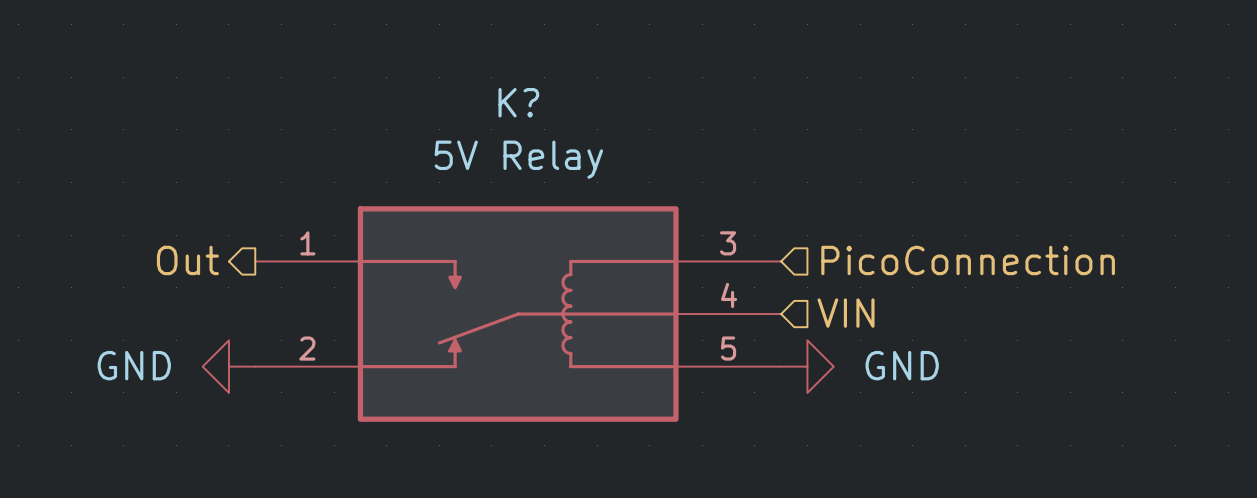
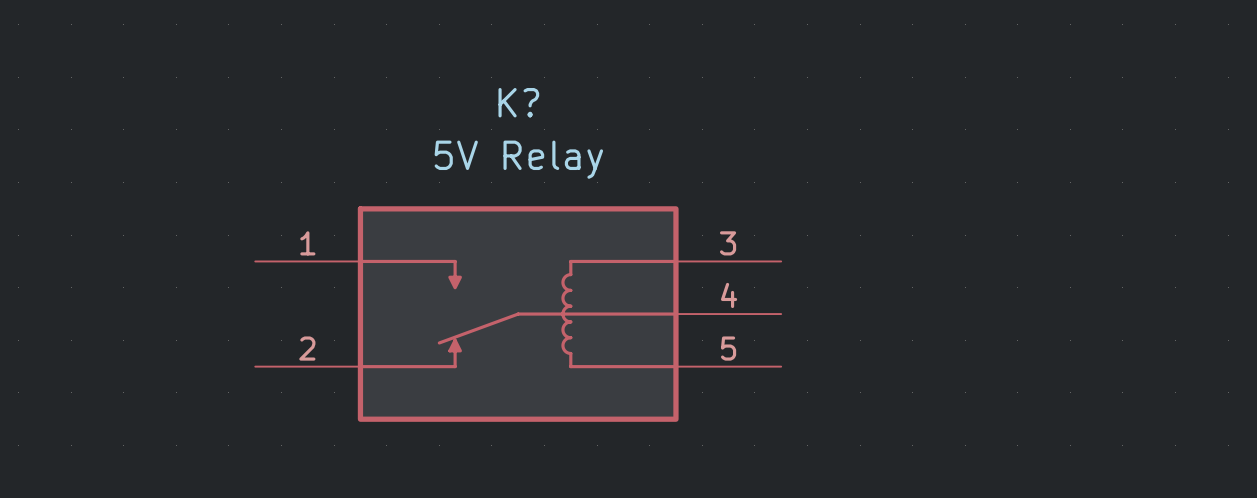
hierarchical label: Out (187, 260) -> none
hierarchical label: PicoConnection (968, 260) -> none
hierarchical label: VIN (846, 313) -> none
power symbol: GND (228, 366) -> none
power symbol: GND (807, 366) -> none

